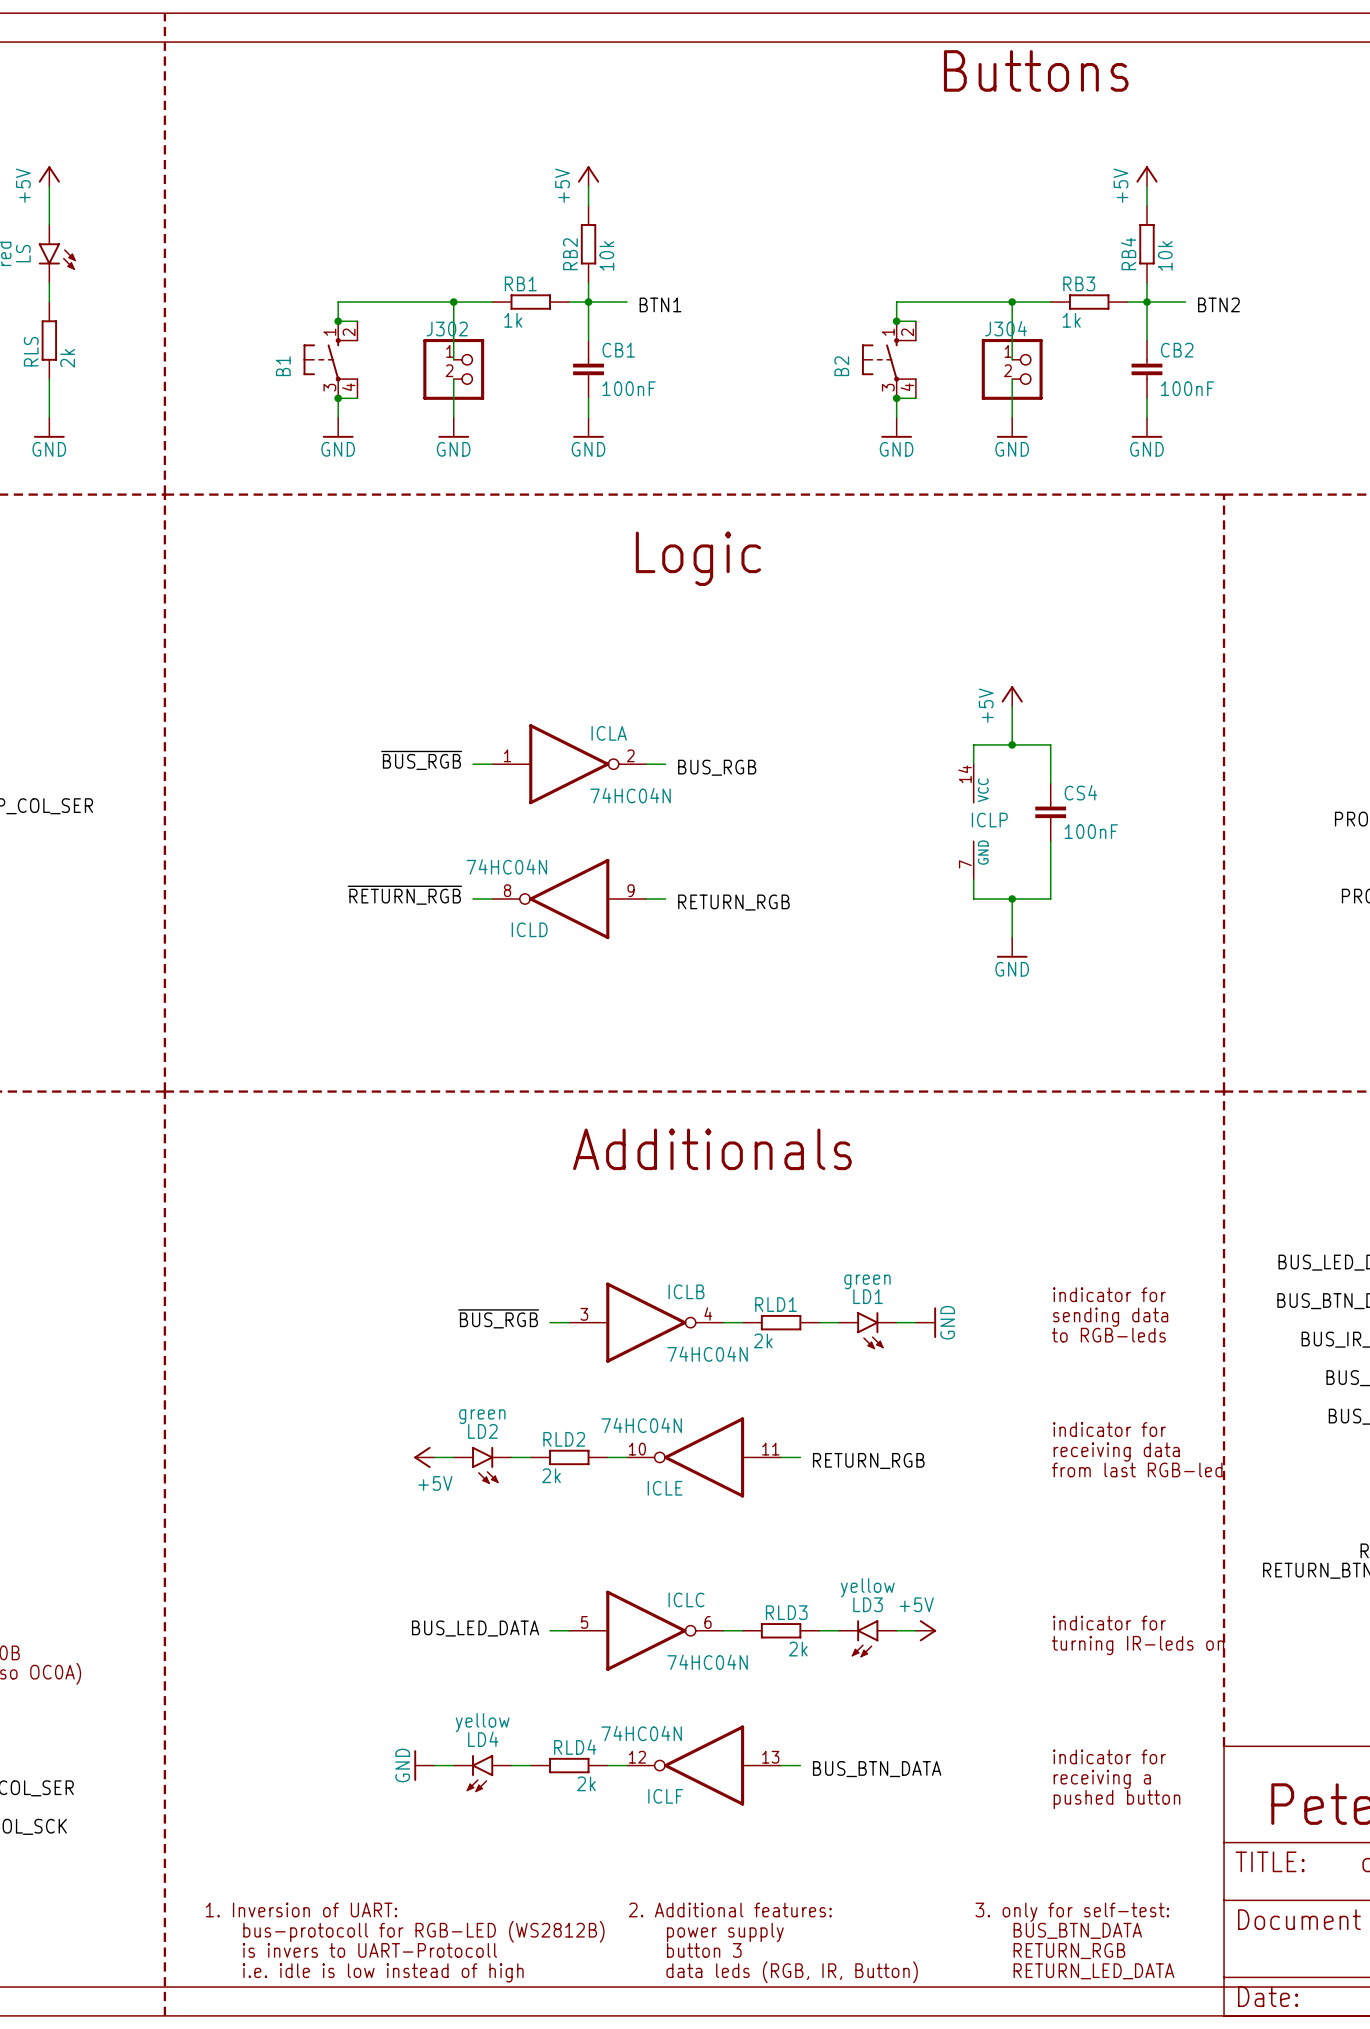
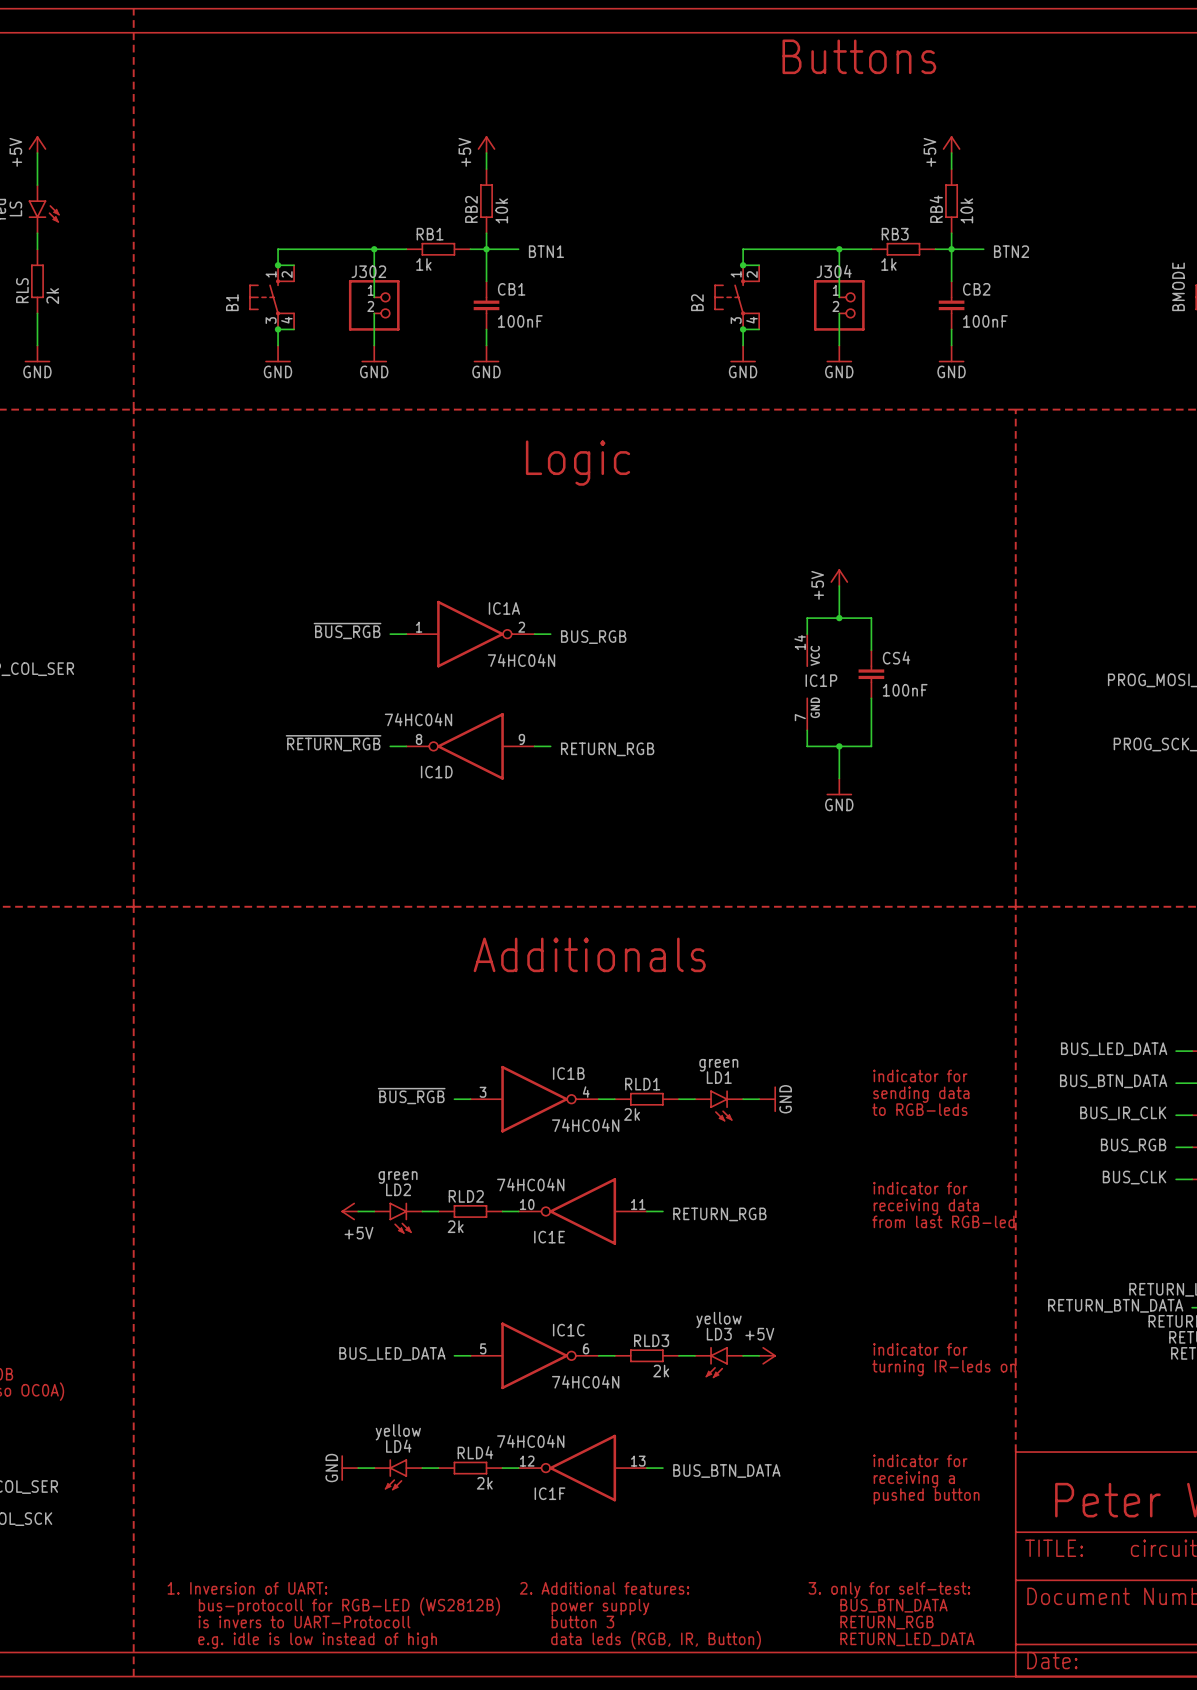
ICLA name: ICLA (609, 733) -> IC1A (504, 608)
ICLP name: ICLP (989, 820) -> IC1P (821, 680)
ICLD name: ICLD (529, 929) -> IC1D (436, 772)
ICLB name: ICLB (686, 1291) -> IC1B (568, 1073)
ICLE name: ICLE (665, 1488) -> IC1E (549, 1237)
ICLC name: ICLC (686, 1599) -> IC1C (568, 1330)
ICLF name: ICLF (665, 1796) -> IC1F (549, 1493)
text: i.e. idle is low instead of high (383, 1972) -> e.g. idle is low instead of high (317, 1640)

